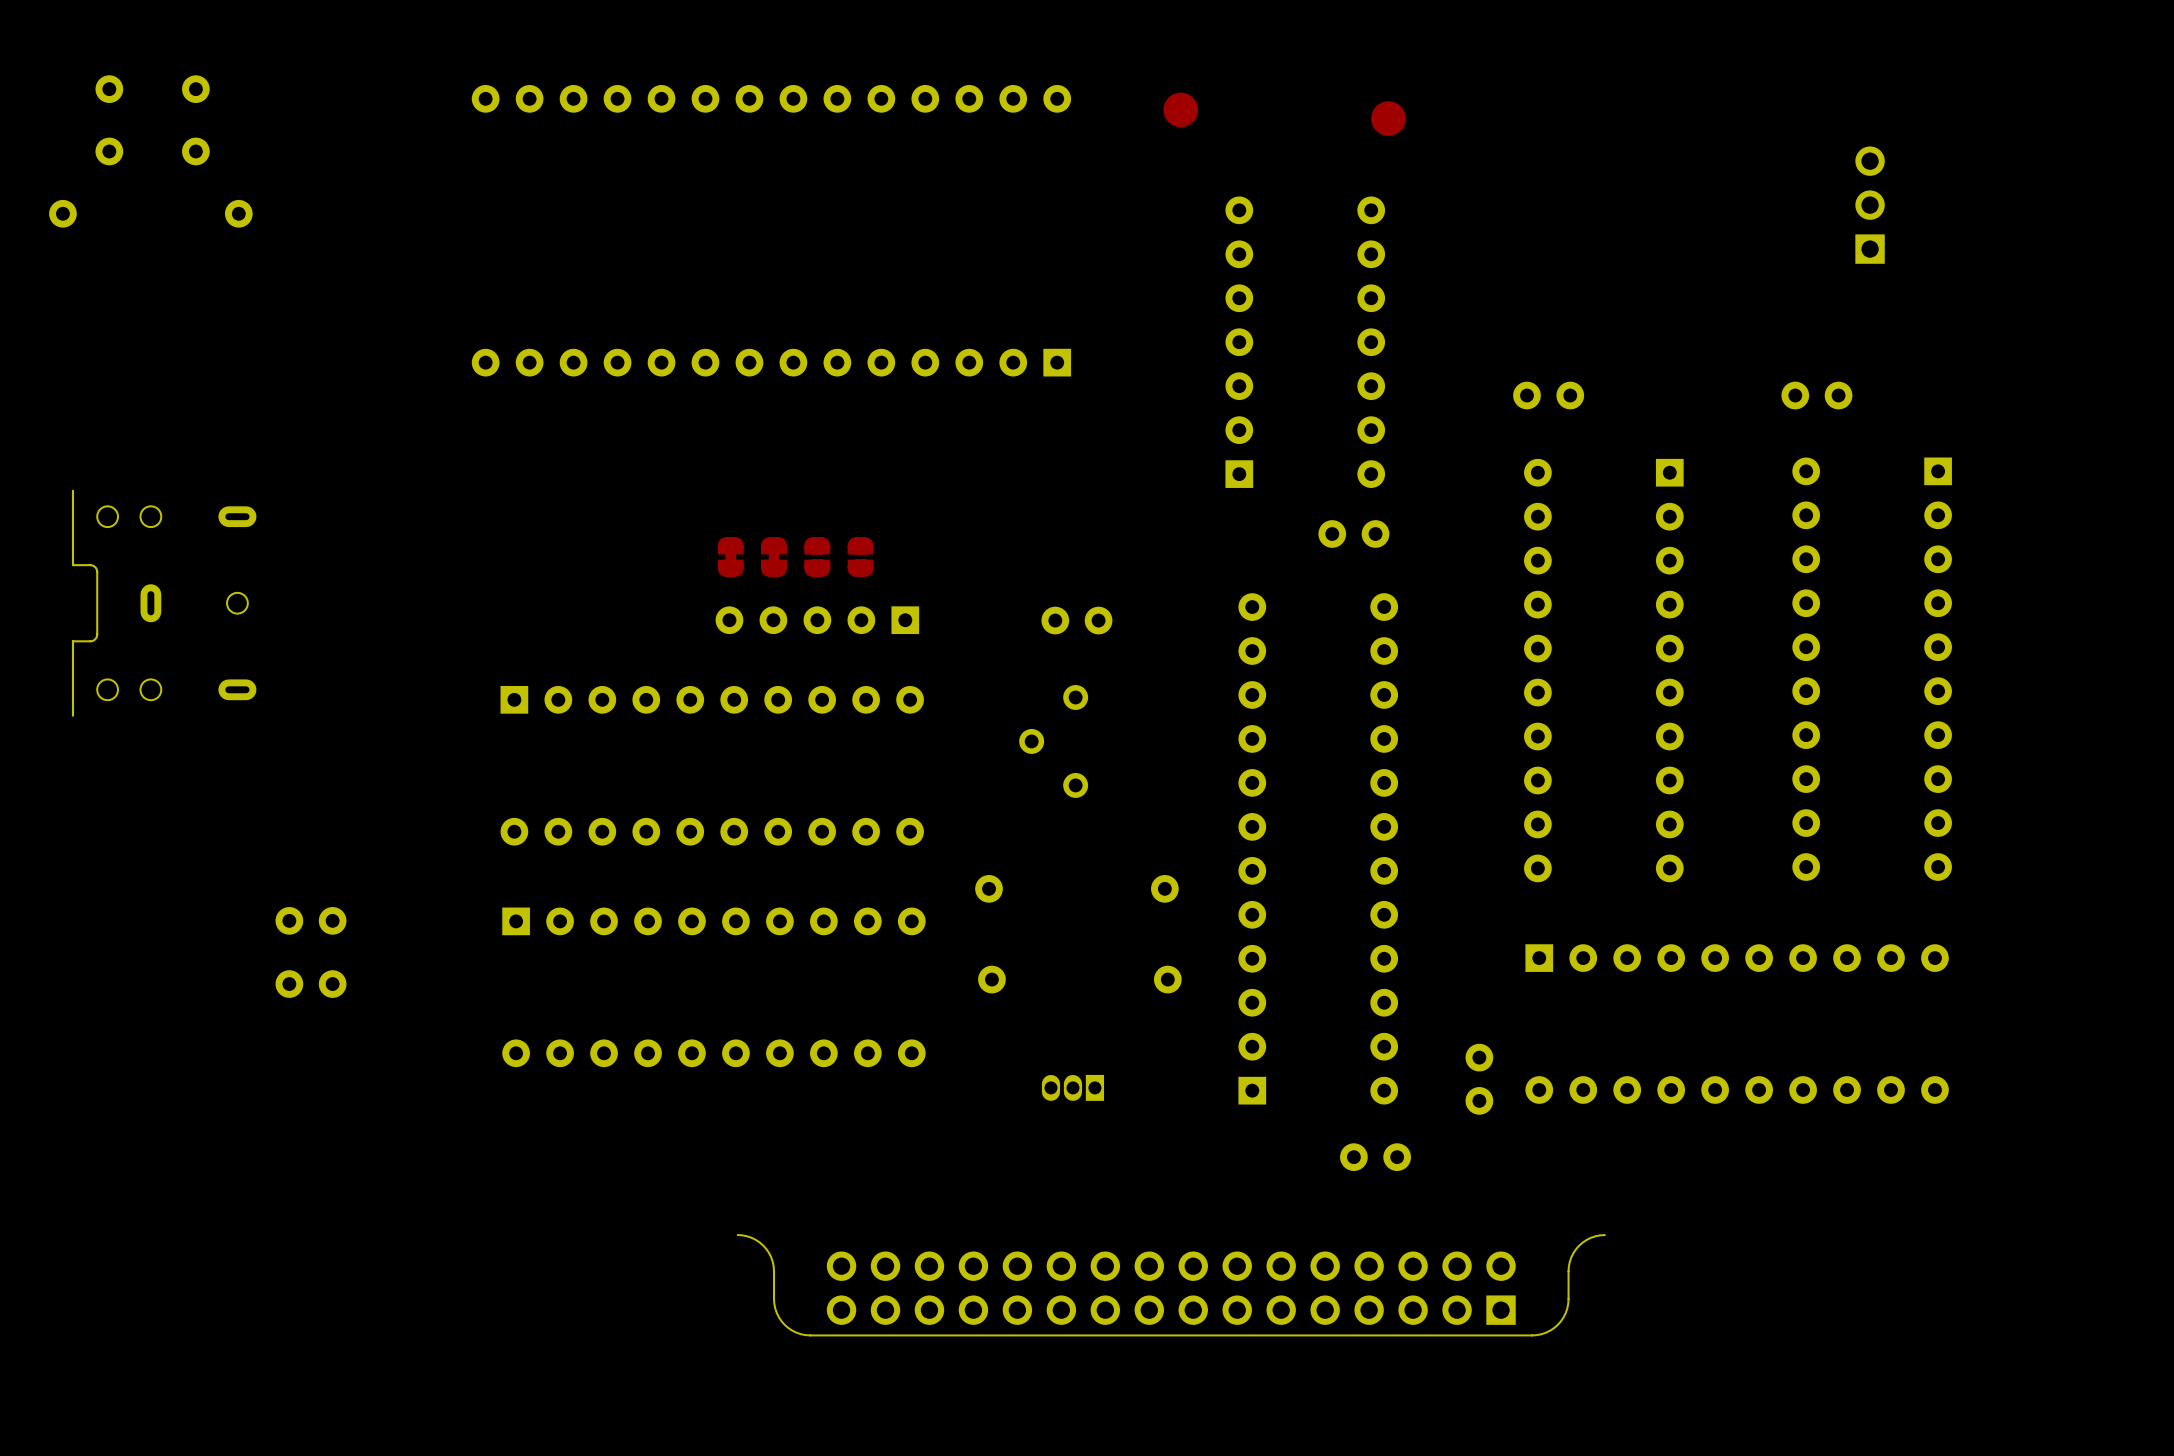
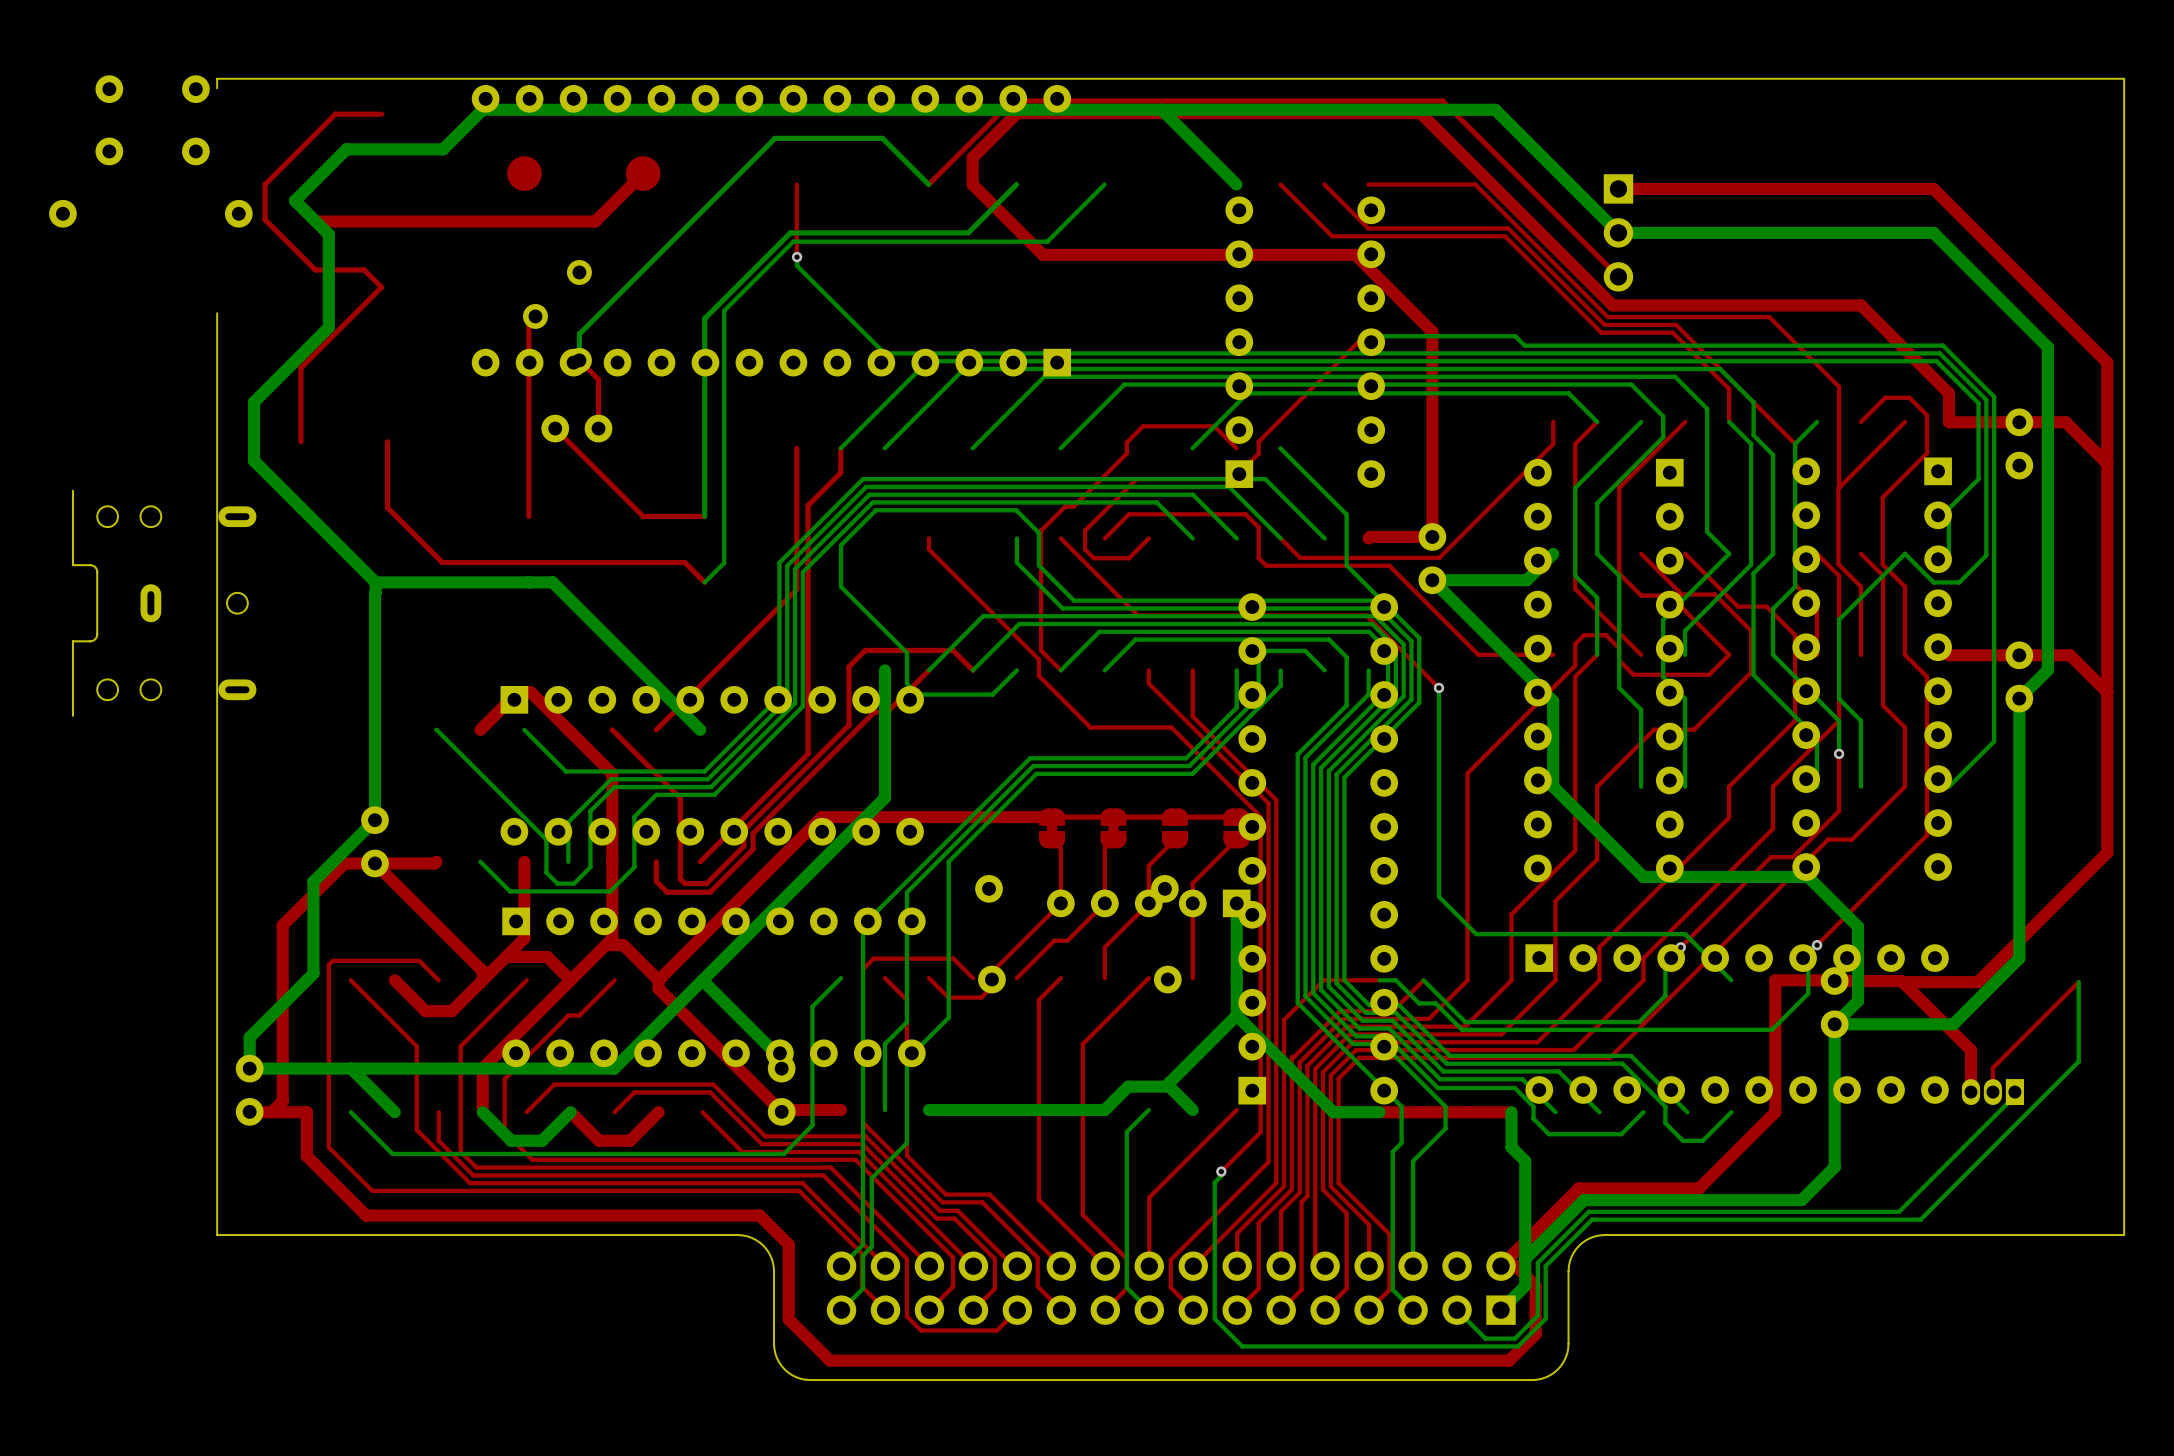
board edge: none -> (217, 88) (217, 78) (2124, 78) (2124, 1235) (1604, 1235)
bottom track: none -> (1161, 109) (1236, 184)
part: (1180, 109) -> none
top track: none -> (381, 114) (335, 114) (265, 184) (265, 219) (315, 269) (364, 269) (381, 287) (300, 367) (300, 441)
part: (1388, 118) -> none
part: none -> (524, 173)
top track: none -> (643, 173) (595, 221) (315, 221) (295, 200)
part: none -> (643, 173)
top track: none -> (796, 184) (797, 257)
top track: none -> (928, 184) (1012, 101) (1442, 101) (1618, 276)
bottom track: none -> (928, 184) (882, 138) (775, 138) (579, 334) (579, 360)
bottom track: none -> (1016, 184) (968, 232) (790, 232) (704, 318) (704, 516)
bottom track: none -> (1104, 184) (1047, 241) (793, 241) (724, 310) (724, 562) (704, 582)
top track: none -> (1280, 184) (1332, 236) (1505, 236) (1601, 332) (1672, 332) (1729, 389) (1729, 421)
top track: none -> (1324, 184) (1368, 228) (1508, 228) (1604, 324) (1676, 324) (1795, 443) (1795, 584) (1816, 606) (1816, 654)
top track: none -> (1368, 184) (1475, 184) (1607, 317) (1769, 317) (1839, 386) (1839, 487)
top track: none -> (1618, 188) (1933, 188) (2107, 362) (2107, 852) (1977, 982) (1902, 982)
part rotation: 0° (1870, 205) -> 180° (1618, 232)
part position: (1870, 205) -> (1618, 232)
bottom track: none -> (797, 257) (797, 265) (884, 353) (1939, 353) (1986, 399) (1986, 555) (1959, 582) (1933, 582) (1905, 553) (1839, 619) (1839, 698) (1860, 720) (1860, 786)
via: none -> (797, 257)
board edge: none -> (217, 313) (217, 1235) (737, 1235)
top track: none -> (535, 316) (528, 323) (528, 516)
part: none -> (557, 316)
top track: none -> (1364, 336) (1258, 441) (1258, 453) (1233, 479) (1136, 479) (1085, 530) (1085, 549) (1093, 558) (1129, 558) (1148, 538)
bottom track: none -> (1364, 336) (1515, 336) (1524, 345) (1943, 345) (1994, 396) (1994, 741) (1948, 786)
top track: none -> (579, 360) (598, 379) (598, 428)
part: (1548, 395) -> none
part: (1816, 395) -> none
top track: none -> (1553, 421) (1553, 443) (1439, 557) (1300, 557) (1280, 538)
top track: none -> (1597, 421) (1575, 443) (1575, 588) (1641, 654)
bottom track: none -> (1597, 421) (1568, 393) (1247, 393) (1192, 448)
bottom track: none -> (1641, 421) (1575, 487) (1575, 575) (1597, 597) (1597, 654)
top track: none -> (1685, 421) (1619, 487) (1619, 573) (1641, 595) (1669, 595) (1729, 654) (1709, 674) (1633, 674) (1619, 660) (1619, 648) (1606, 635) (1584, 635) (1575, 643) (1575, 665) (1467, 773) (1467, 980) (1428, 1018) (1343, 1018) (1299, 1062) (1299, 1192) (1281, 1211) (1281, 1266)
bottom track: none -> (1729, 421) (1751, 443) (1751, 564) (1685, 630) (1685, 654)
bottom track: none -> (1817, 421) (1795, 443) (1795, 586) (1773, 608) (1773, 654) (1839, 720) (1839, 753)
top track: none -> (1861, 421) (1885, 397) (1909, 397) (1926, 415) (1926, 453) (1882, 497) (1882, 564) (1904, 586) (1904, 654) (1926, 676) (1926, 835) (1817, 945)
top track: none -> (1905, 421) (1838, 488) (1838, 564) (1860, 586) (1860, 654)
top track: none -> (555, 428) (643, 516) (704, 516)
part: none -> (576, 428)
top track: none -> (387, 441) (387, 507) (442, 562) (684, 562) (704, 582)
part: none -> (2019, 443)
top track: none -> (796, 448) (796, 589) (656, 729)
top track: none -> (840, 448) (840, 472) (808, 505) (808, 753) (700, 861)
bottom track: none -> (840, 448) (927, 361) (1936, 361) (1978, 403) (1978, 479) (1948, 508) (1948, 553)
bottom track: none -> (884, 448) (964, 369) (1720, 369) (1753, 402) (1753, 435) (1773, 454) (1773, 553) (1753, 573) (1753, 674) (1816, 738) (1816, 786)
bottom track: none -> (972, 448) (1044, 376) (1675, 376) (1707, 408) (1707, 531) (1729, 553) (1663, 619) (1663, 676) (1685, 698) (1685, 786)
bottom track: none -> (1060, 448) (1124, 384) (1631, 384) (1663, 416) (1663, 437) (1597, 503) (1597, 553) (1619, 575) (1619, 687) (1641, 709) (1641, 786)
top track: none -> (1236, 448) (1214, 426) (1142, 426) (1126, 442) (1126, 453) (1073, 506) (1065, 506) (1041, 530) (1041, 650) (1060, 670)
bottom track: none -> (1280, 448) (1346, 514) (1346, 565) (1419, 637) (1419, 702) (1344, 777) (1344, 980) (1369, 1005) (1399, 1005) (1449, 1055) (1631, 1055) (1687, 1112)
top track: none -> (2107, 463) (2065, 422) (1949, 422) (1948, 393) (1861, 305) (1612, 305) (1420, 113) (1017, 113) (972, 157) (972, 184) (1043, 254) (1355, 254) (1432, 331) (1432, 536) (1368, 538)
part rotation: 0° (1353, 534) -> 90° clockwise (1432, 558)
part position: (1353, 534) -> (1432, 558)
top track: none -> (928, 538) (928, 549) (1038, 659) (1038, 675) (1090, 727) (1171, 727) (1260, 816) (1260, 1132) (1221, 1171)
bottom track: none -> (1016, 538) (1016, 562) (1062, 608) (1378, 608) (1411, 641) (1411, 699) (1336, 774) (1336, 983) (1366, 1012) (1395, 1012) (1446, 1063) (1622, 1063) (1665, 1106) (1665, 1123) (1682, 1140) (1702, 1140) (1731, 1112)
top track: none -> (1060, 538) (1137, 615) (1366, 615) (1438, 687)
top track: none -> (1104, 538) (1129, 514) (1245, 514) (1258, 527) (1258, 558) (1266, 565) (1389, 565) (1478, 654) (1553, 654)
bottom track: none -> (1192, 538) (1156, 502) (872, 502) (802, 572) (802, 706) (714, 794) (656, 794) (634, 816) (634, 867) (610, 891) (510, 891) (480, 861)
bottom track: none -> (1236, 538) (1192, 494) (869, 494) (795, 569) (795, 703) (711, 787) (614, 787) (590, 811) (590, 867) (574, 883) (557, 883) (546, 872) (546, 839) (436, 729)
bottom track: none -> (1280, 538) (1229, 486) (866, 486) (787, 565) (787, 699) (707, 779) (611, 779) (568, 822) (568, 861)
bottom track: none -> (1324, 538) (1265, 479) (863, 479) (779, 562) (779, 696) (704, 771) (565, 771) (524, 729)
bottom track: none -> (1553, 553) (1526, 580) (1432, 580) (1553, 701) (1553, 786) (1643, 877) (1808, 877) (1858, 926) (1858, 1000) (1834, 1024)
top track: none -> (1641, 553) (1681, 594) (1714, 594) (1751, 630) (1751, 672) (1693, 729) (1654, 729) (1597, 786) (1597, 859) (1555, 901) (1555, 980) (1501, 1034) (1349, 1034) (1315, 1068) (1315, 1256) (1325, 1266)
top track: none -> (1685, 553) (1737, 606) (1766, 606) (1795, 635) (1795, 720) (1729, 786) (1729, 817) (1599, 947) (1599, 980) (1537, 1042) (1352, 1042) (1323, 1072) (1323, 1189) (1346, 1213) (1346, 1288) (1325, 1310)
top track: none -> (1817, 553) (1839, 575) (1839, 720) (1773, 786) (1773, 828) (1643, 958) (1643, 980) (1573, 1050) (1356, 1050) (1330, 1075) (1330, 1186) (1369, 1224) (1369, 1266)
top track: none -> (1861, 553) (1883, 575) (1883, 705) (1904, 727) (1904, 786) (1851, 839) (1828, 839) (1609, 1057) (1359, 1057) (1338, 1078) (1338, 1183) (1389, 1234) (1389, 1289) (1369, 1310)
part: (730, 557) -> none
part: (774, 557) -> none
part: (817, 557) -> none
part: (860, 557) -> none
bottom track: none -> (375, 582) (374, 820) (313, 881) (313, 973) (249, 1037) (249, 1068) (614, 1068) (884, 797) (884, 670)
bottom track: none -> (375, 582) (552, 582) (700, 729)
bottom track: none -> (375, 582) (254, 460) (254, 402) (328, 327) (328, 234) (295, 200) (346, 149) (443, 149) (482, 109) (1495, 109) (1618, 232) (1933, 232) (2047, 347) (2047, 670) (2019, 698) (2019, 958) (1953, 1024) (1834, 1024)
bottom track: none -> (1381, 600) (1074, 600) (1038, 565) (1038, 532) (1016, 510) (875, 510) (841, 545) (841, 586) (906, 652) (906, 683) (917, 694) (992, 694) (1016, 670)
part: (817, 620) -> none
part: (1076, 620) -> none
top track: none -> (1597, 654) (1575, 676) (1575, 850) (1511, 914) (1511, 980) (1465, 1026) (1346, 1026) (1307, 1065) (1307, 1196) (1301, 1201) (1301, 1289) (1281, 1310)
top track: none -> (1948, 654) (2070, 655) (2107, 692)
top track: none -> (928, 670) (887, 712) (874, 712) (753, 833) (753, 849) (710, 892) (667, 892) (656, 881) (656, 861)
bottom track: none -> (928, 670) (983, 616) (1375, 616) (1403, 644) (1403, 696) (1328, 771) (1328, 986) (1362, 1020) (1392, 1020) (1443, 1071) (1558, 1071) (1599, 1112)
top track: none -> (972, 670) (953, 650) (865, 650) (848, 666) (848, 725) (743, 830) (743, 846) (706, 883) (684, 883) (680, 878) (680, 797) (612, 729)
bottom track: none -> (972, 670) (1019, 624) (1372, 624) (1395, 647) (1395, 693) (1321, 767) (1321, 990) (1359, 1028) (1389, 1028) (1440, 1079) (1522, 1079) (1555, 1112)
bottom track: none -> (1060, 670) (1099, 631) (1369, 631) (1388, 650) (1388, 689) (1313, 764) (1313, 993) (1356, 1036) (1386, 1036) (1437, 1088) (1514, 1088) (1533, 1106) (1533, 1118) (1548, 1134) (1621, 1134) (1643, 1112)
bottom track: none -> (1104, 670) (1135, 639) (1329, 639) (1346, 657) (1346, 705) (1297, 754) (1297, 1002) (1401, 1106) (1401, 1143) (1392, 1151) (1392, 1289) (1413, 1310)
top track: none -> (1148, 670) (1148, 683) (1268, 803) (1268, 1162) (1170, 1259) (1170, 1287) (1193, 1310)
top track: none -> (1192, 670) (1192, 716) (1276, 800) (1276, 1183) (1193, 1266)
bottom track: none -> (1236, 670) (1236, 707) (1186, 758) (1030, 758) (863, 925) (863, 1244) (841, 1266)
bottom track: none -> (1280, 670) (1280, 685) (1192, 773) (1036, 773) (948, 861) (948, 1017) (906, 1059) (906, 1143) (871, 1178) (871, 1246) (863, 1255) (863, 1288) (841, 1310)
bottom track: none -> (1324, 670) (1305, 650) (1267, 650) (1258, 659) (1258, 696) (1189, 766) (1033, 766) (906, 892) (906, 1022) (884, 1044) (884, 1110)
bottom track: none -> (1368, 670) (1368, 694) (1305, 757) (1305, 996) (1353, 1044) (1382, 1044) (1445, 1106) (1445, 1128) (1413, 1161) (1413, 1266)
part: none -> (2019, 676)
bottom track: none -> (1438, 687) (1438, 896) (1476, 934) (1685, 934) (1731, 980)
via: none -> (1438, 687)
top track: none -> (480, 729) (517, 692) (530, 692) (612, 773) (612, 938) (482, 1068) (482, 1112)
part: (1053, 741) -> none
top track: none -> (1839, 753) (1839, 811) (1792, 857) (1770, 857) (1680, 947)
via: none -> (1839, 753)
top track: none -> (1236, 817) (821, 817) (658, 980)
part: none -> (1052, 828)
part: none -> (1113, 828)
part: none -> (1174, 828)
part: none -> (1236, 828)
top track: none -> (1052, 839) (1060, 848) (1060, 903) (994, 969) (994, 984) (981, 997) (948, 997) (928, 978)
top track: none -> (1113, 839) (1104, 848) (1104, 903) (1067, 940) (1054, 940) (1016, 978)
top track: none -> (1174, 839) (1148, 865) (1148, 903) (1104, 947) (1104, 978)
top track: none -> (1236, 839) (1192, 883) (1192, 978)
part: none -> (374, 841)
top track: none -> (436, 861) (434, 863) (344, 863) (282, 925) (282, 1101) (271, 1112)
top track: none -> (524, 861) (524, 938) (451, 1011) (425, 1011) (394, 980)
top track: none -> (374, 863) (482, 971) (482, 980)
part: none -> (1148, 903)
bottom track: none -> (1236, 903) (1236, 1015)
part: (310, 920) -> none
top track: none -> (605, 945) (623, 945) (658, 980)
bottom track: none -> (1817, 945) (1808, 951) (1808, 993) (1771, 1029) (1462, 1029) (1435, 1003) (1419, 1003) (1396, 980) (1379, 980)
via: none -> (1817, 945)
bottom track: none -> (1680, 947) (1665, 962) (1665, 995) (1639, 1022) (1465, 1022) (1423, 980)
via: none -> (1680, 947)
top track: none -> (506, 956) (547, 956) (570, 980)
bottom track: none -> (841, 978) (812, 1006) (812, 1125) (783, 1153) (392, 1153) (350, 1112)
top track: none -> (884, 978) (906, 1000) (906, 1155) (945, 1194) (989, 1194) (1061, 1266)
top track: none -> (972, 978) (953, 958) (873, 958) (863, 969) (863, 1122) (942, 1202) (982, 1202) (1037, 1257) (1037, 1286) (1061, 1310)
top track: none -> (1060, 978) (1038, 1000) (1038, 1199) (1105, 1266)
top track: none -> (1148, 978) (1082, 1044) (1082, 1214) (1126, 1258) (1126, 1288) (1105, 1310)
top track: none -> (350, 980) (416, 1046) (416, 1129) (470, 1183) (802, 1183) (885, 1266)
top track: none -> (438, 980) (419, 960) (332, 960) (328, 964) (328, 1147) (372, 1190) (799, 1190) (861, 1253) (861, 1286) (885, 1310)
top track: none -> (526, 980) (460, 1046) (460, 1151) (476, 1167) (830, 1167) (929, 1266)
top track: none -> (614, 980) (579, 1015) (568, 1015) (504, 1079) (504, 1132) (532, 1159) (855, 1159) (953, 1257) (953, 1286)
top track: none -> (658, 980) (658, 988) (781, 1111) (783, 1110) (841, 1110)
bottom track: none -> (702, 980) (781, 1059) (781, 1068)
top track: none -> (1379, 980) (1323, 980) (1284, 1019) (1284, 1186) (1237, 1233) (1237, 1266)
top track: none -> (1423, 980) (1392, 1011) (1340, 1011) (1291, 1057) (1291, 1189) (1258, 1222) (1258, 1288) (1237, 1310)
top track: none -> (2078, 982) (1992, 1067) (1992, 1092)
bottom track: none -> (2078, 982) (2078, 1061) (1920, 1219) (1592, 1219) (1545, 1266) (1545, 1318) (1518, 1346) (1242, 1346) (1214, 1318) (1214, 1182) (1221, 1175) (1221, 1171)
part: (310, 984) -> none
part: none -> (1834, 1002)
bottom track: none -> (1236, 1015) (1333, 1112) (1379, 1112)
bottom track: none -> (1236, 1015) (1169, 1082) (1169, 1086)
bottom track: none -> (1834, 1024) (1834, 1167) (1801, 1200) (1584, 1200) (1525, 1258)
bottom track: none -> (351, 1068) (394, 1112)
part: (1479, 1079) -> none
bottom track: none -> (1169, 1086) (1192, 1110)
bottom track: none -> (1169, 1086) (1128, 1086) (1104, 1110) (928, 1110)
part: (1072, 1087) -> none
part: none -> (249, 1090)
part: none -> (781, 1090)
top track: none -> (1970, 1092) (1970, 1050) (1901, 981) (1775, 980) (1775, 1112) (1699, 1188) (1578, 1188) (1501, 1266) (1516, 1266) (1535, 1285) (1535, 1334) (1509, 1360) (830, 1360) (788, 1319) (788, 1244) (759, 1215) (366, 1215) (306, 1156) (306, 1112) (249, 1111)
part: none -> (1992, 1092)
bottom track: none -> (2014, 1092) (2014, 1095) (1899, 1211) (1588, 1211) (1537, 1262) (1537, 1315) (1514, 1338) (1485, 1338) (1457, 1310)
bottom track: none -> (1148, 1110) (1126, 1132) (1126, 1287) (1149, 1310)
top track: none -> (1236, 1110) (1149, 1197) (1149, 1266)
top track: none -> (438, 1112) (438, 1140) (473, 1175) (823, 1175) (906, 1258) (906, 1316) (921, 1330) (997, 1330) (1017, 1310)
top track: none -> (526, 1112) (554, 1084) (713, 1084) (765, 1136) (865, 1136) (940, 1210) (957, 1210) (1013, 1266) (1017, 1266)
bottom track: none -> (570, 1112) (542, 1140) (511, 1140) (482, 1112)
top track: none -> (614, 1112) (634, 1092) (710, 1092) (762, 1144) (862, 1144) (936, 1218) (954, 1218) (994, 1258) (994, 1288) (973, 1310)
top track: none -> (658, 1112) (629, 1140) (599, 1140) (570, 1112)
top track: none -> (702, 1112) (742, 1151) (859, 1151) (973, 1266)
top track: none -> (1511, 1112) (1379, 1112)
bottom track: none -> (1511, 1112) (1511, 1147) (1525, 1161) (1525, 1285) (1501, 1310)
part: (1375, 1157) -> none
via: none -> (1221, 1171)
top track: none -> (953, 1286) (929, 1310)
board edge: (1568, 1299) (1565, 1312) (1557, 1324) (1546, 1332) (1532, 1335) (810, 1335) (796, 1332) (784, 1324) (776, 1312) (774, 1299) -> (1568, 1299) (1568, 1343) (1565, 1357) (1554, 1372) (1541, 1378) (1532, 1380) (805, 1379) (788, 1372) (776, 1357) (774, 1343) (774, 1299)

